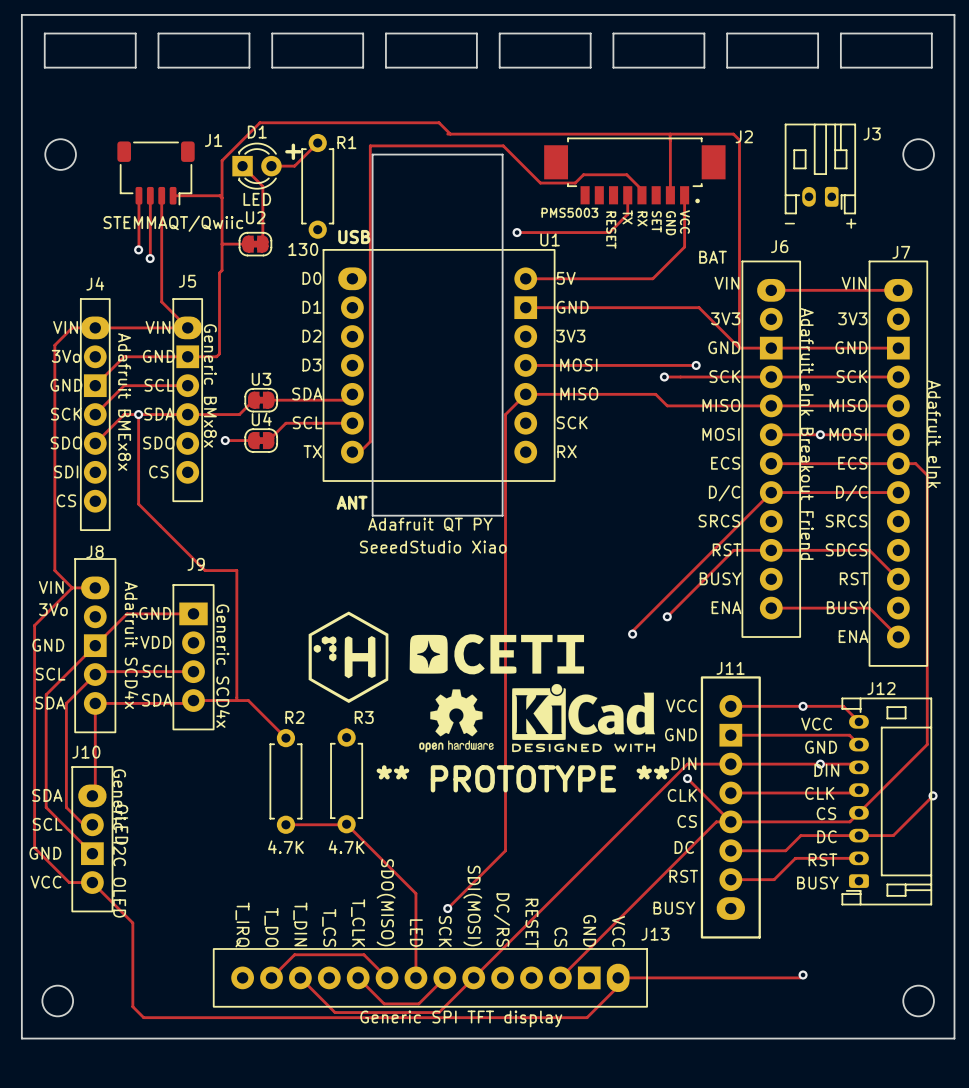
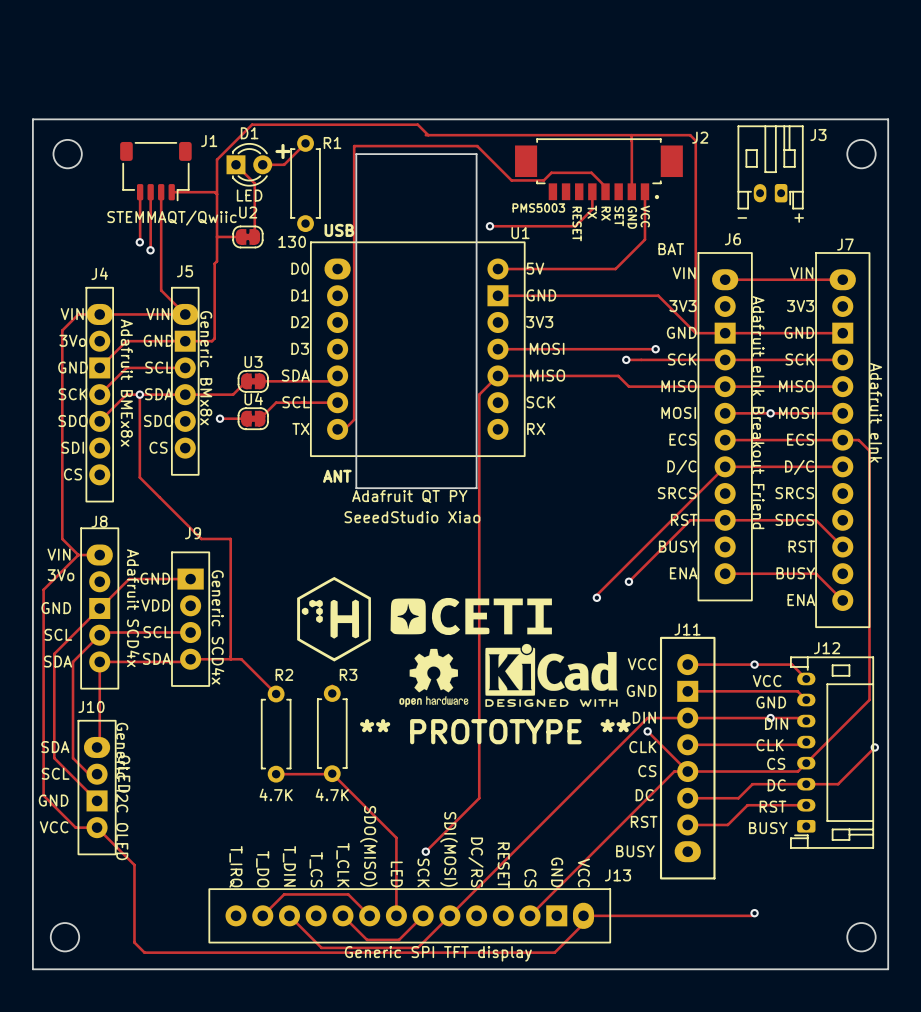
board edge: (21, 14) (954, 14) (954, 1038) (21, 1038) (21, 14) -> (32, 119) (32, 969) (888, 969) (888, 119) (32, 119)
board edge: (44, 33) (135, 33) (135, 67) (44, 67) (44, 33) -> none
board edge: (158, 33) (249, 33) (249, 67) (158, 67) (158, 33) -> none
board edge: (272, 33) (363, 33) (363, 67) (272, 67) (272, 33) -> none
board edge: (385, 33) (476, 33) (476, 67) (385, 67) (385, 33) -> none
board edge: (499, 33) (590, 33) (590, 67) (499, 67) (499, 33) -> none
board edge: (613, 33) (704, 33) (704, 67) (613, 67) (613, 33) -> none
board edge: (727, 33) (818, 33) (818, 67) (727, 67) (727, 33) -> none
board edge: (840, 33) (931, 33) (931, 67) (840, 67) (840, 33) -> none

